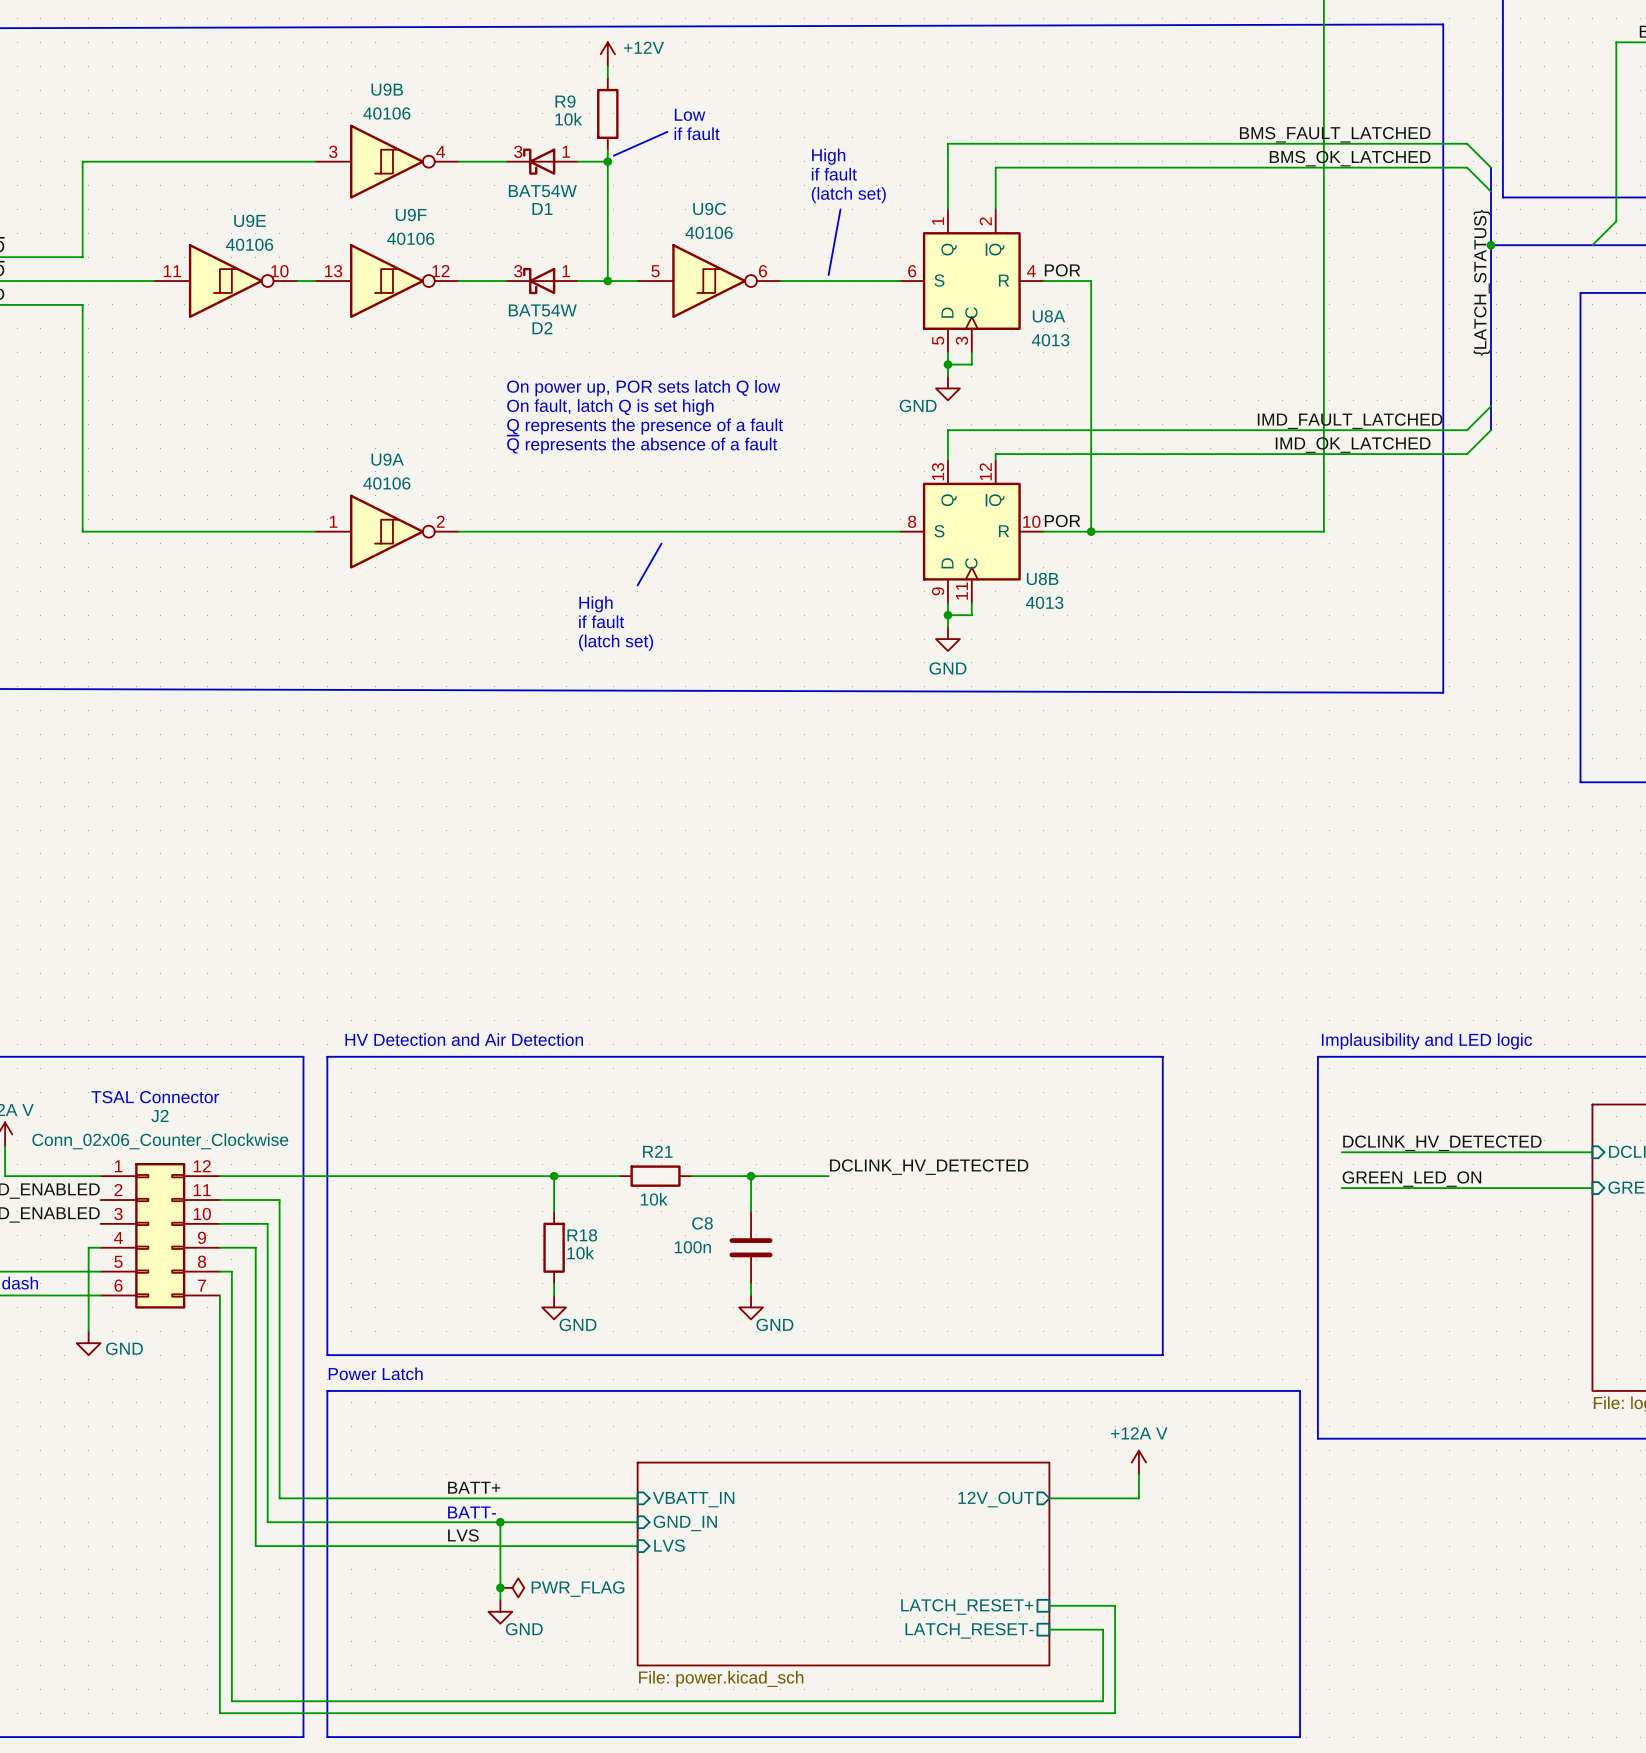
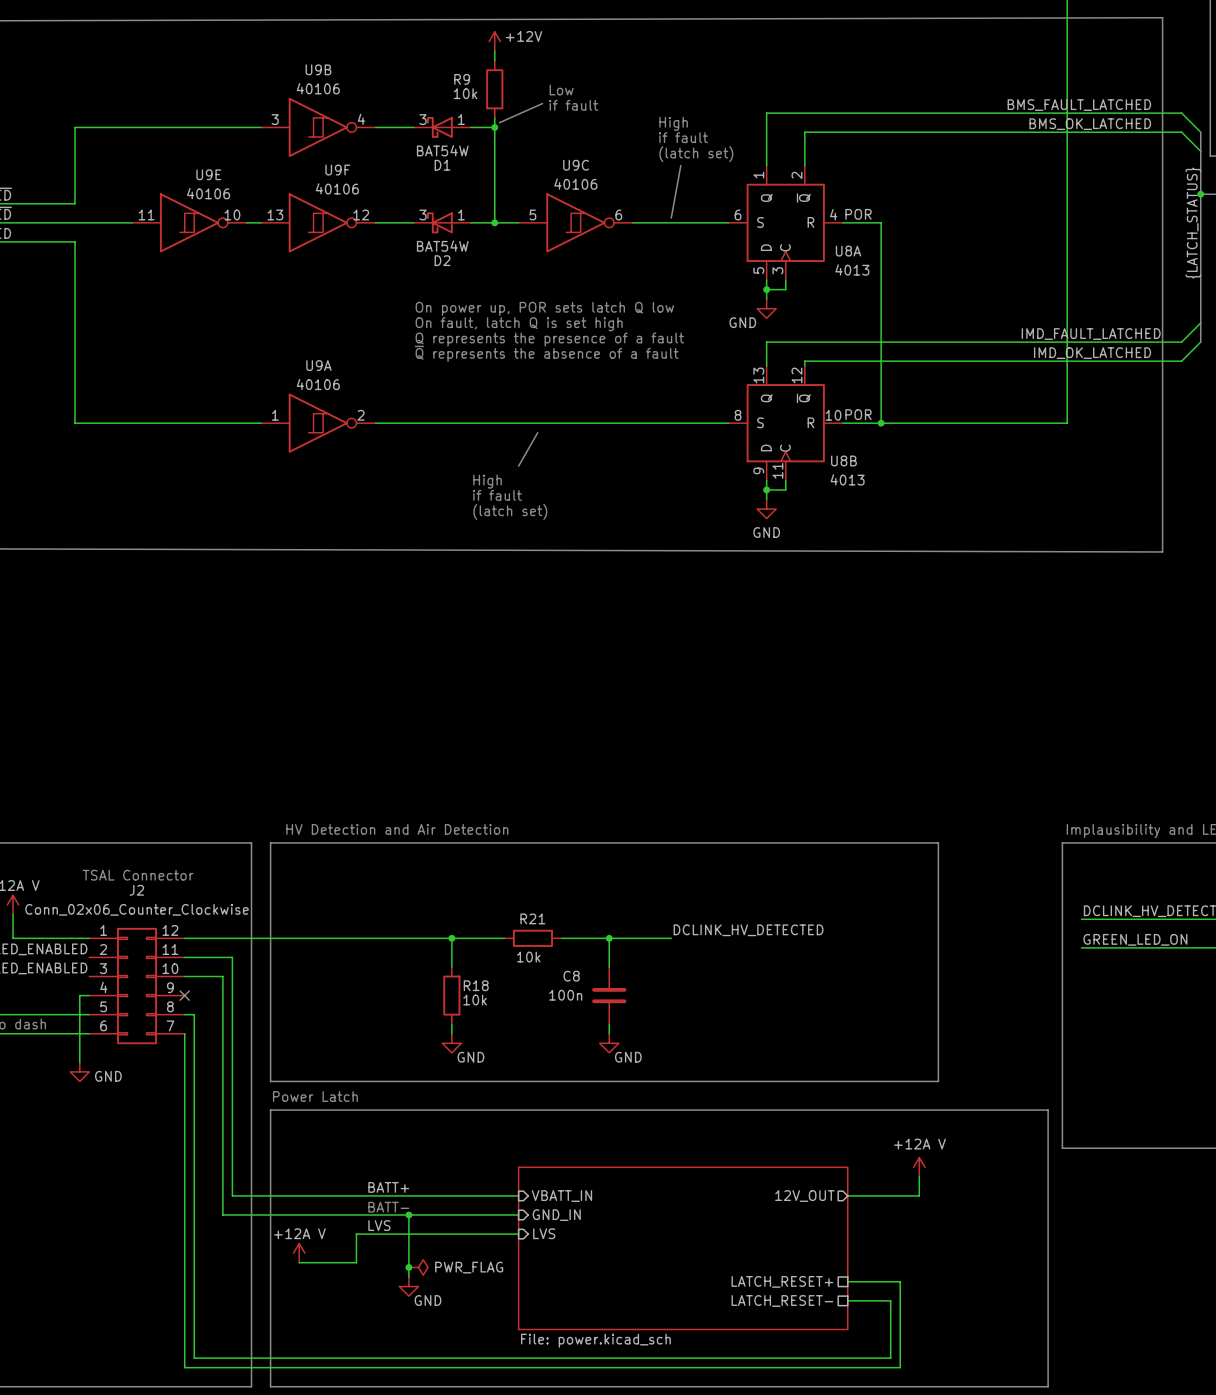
wire: (219, 1247) (255, 1247) (255, 1546) (434, 1546) -> (299, 1262) (356, 1262) (356, 1234)
no-connect mark: none -> (184, 995)
power symbol: none -> +12A V (299, 1253)

